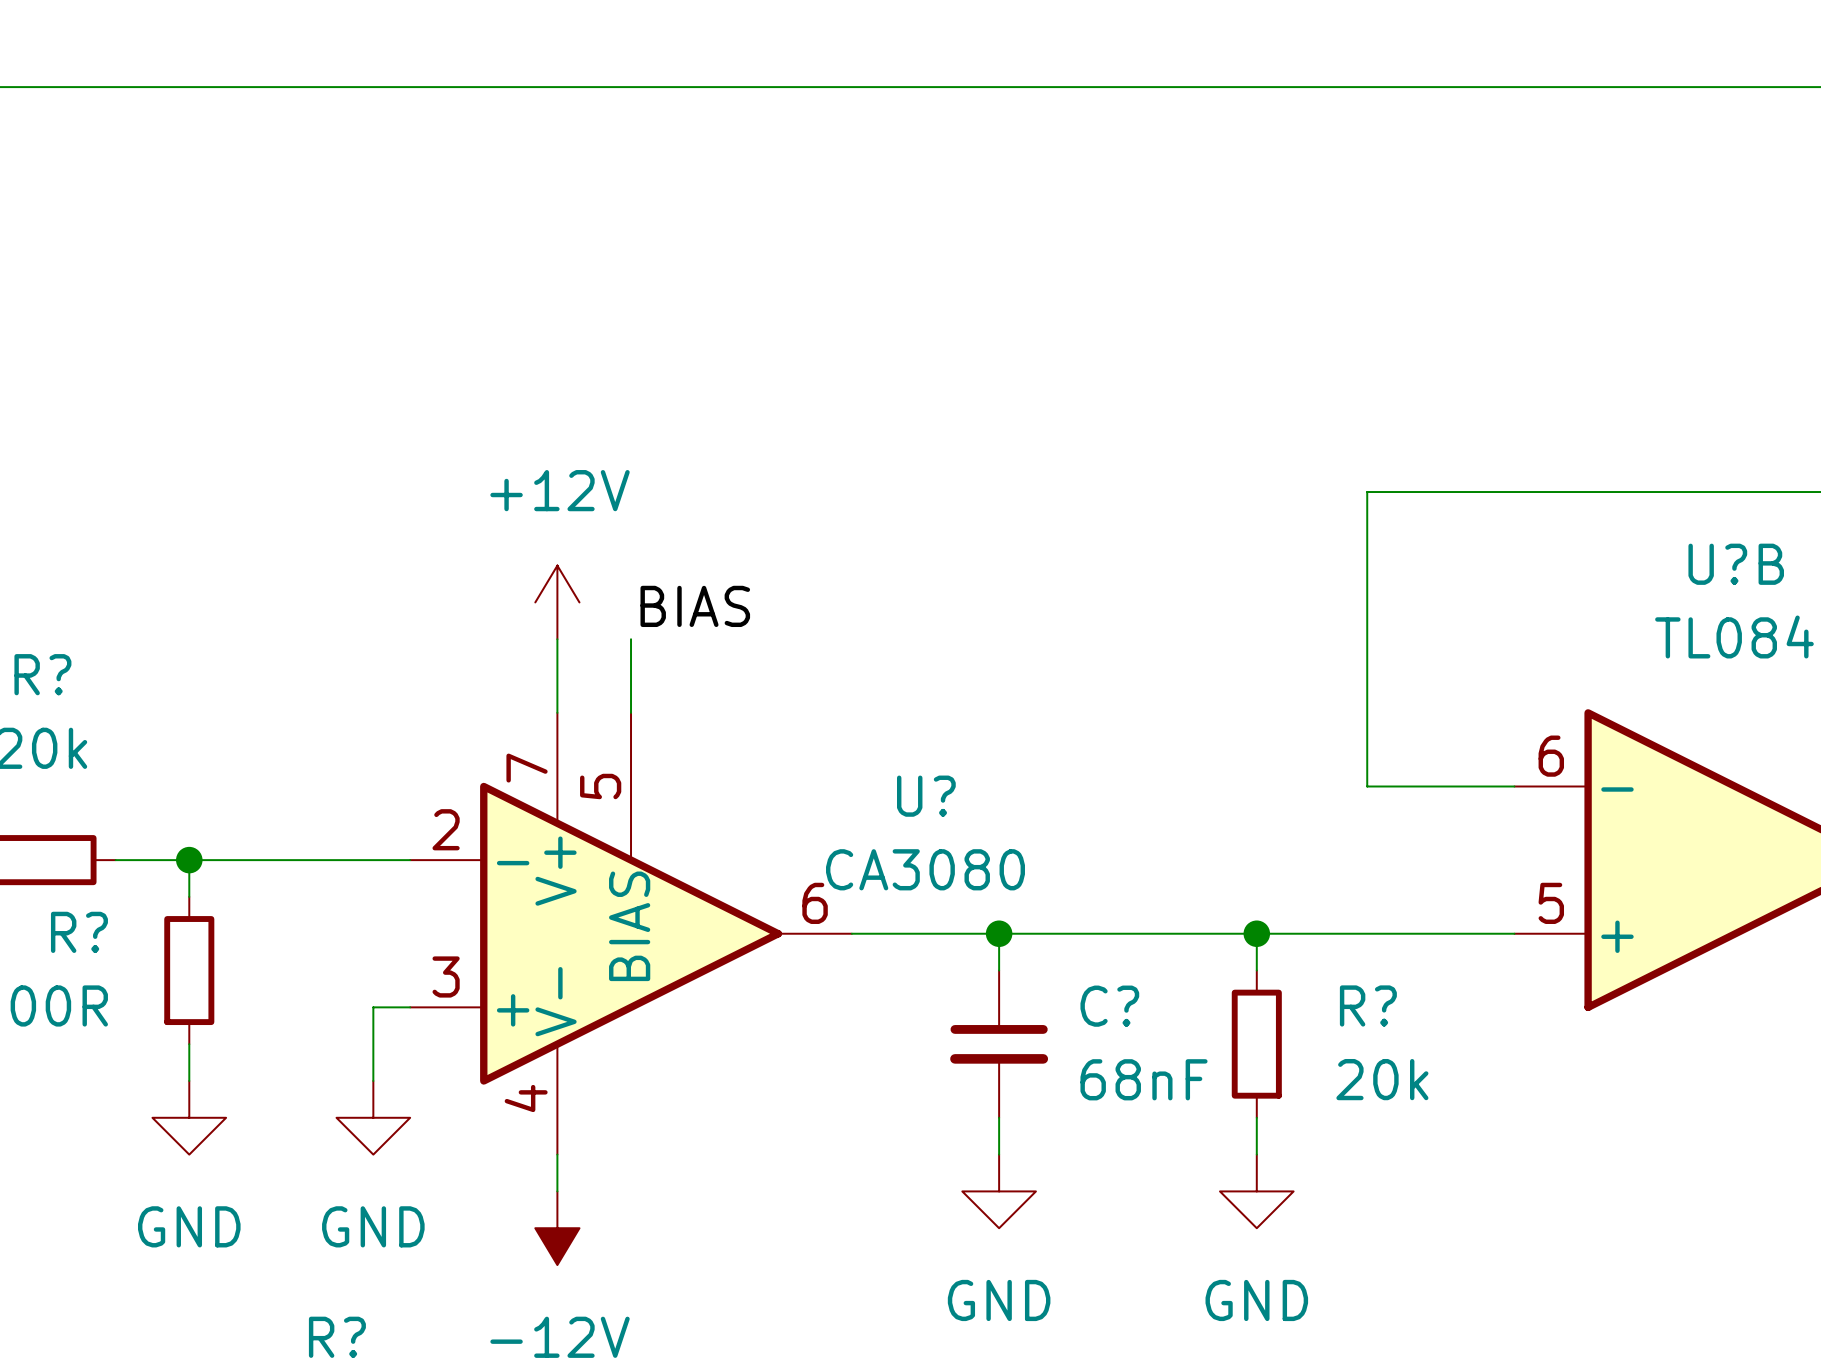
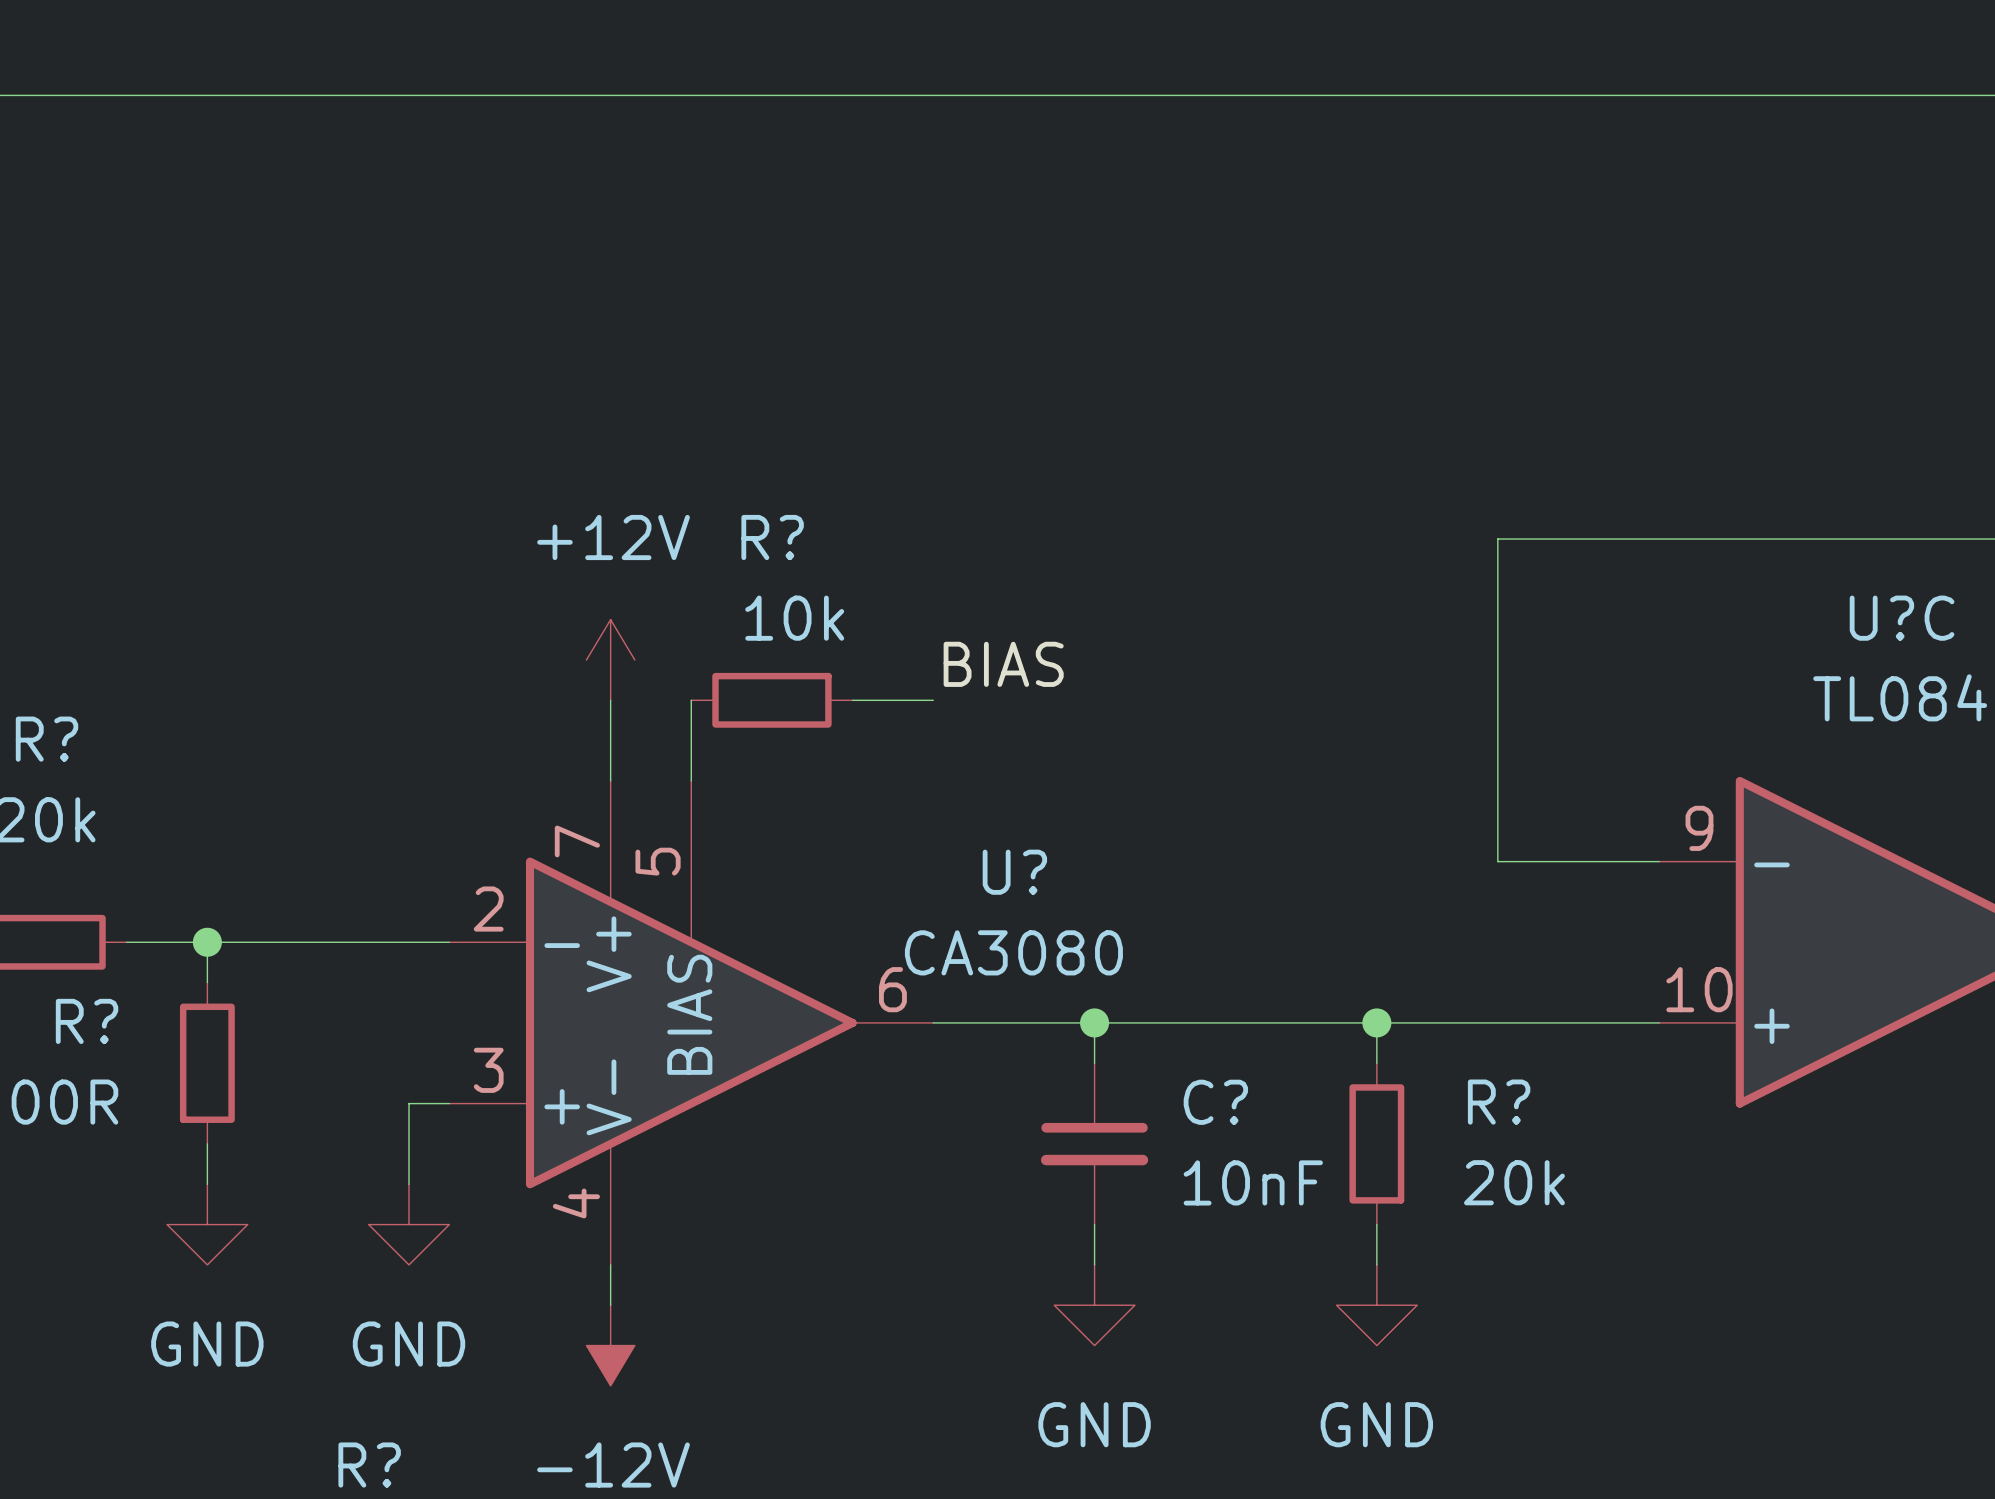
U?B name: U?B (1736, 564) -> U?C (1902, 618)
label position: BIAS (695, 606) -> BIAS (1003, 664)
R?: none -> 10k (771, 700)
wire: none -> (852, 700) (933, 700)
U?B pin number: 6 (1551, 756) -> 9 (1699, 828)
U?B pin number: 5 (1551, 903) -> 10 (1699, 989)
C? value: 68nF (1144, 1079) -> 10nF (1253, 1182)

